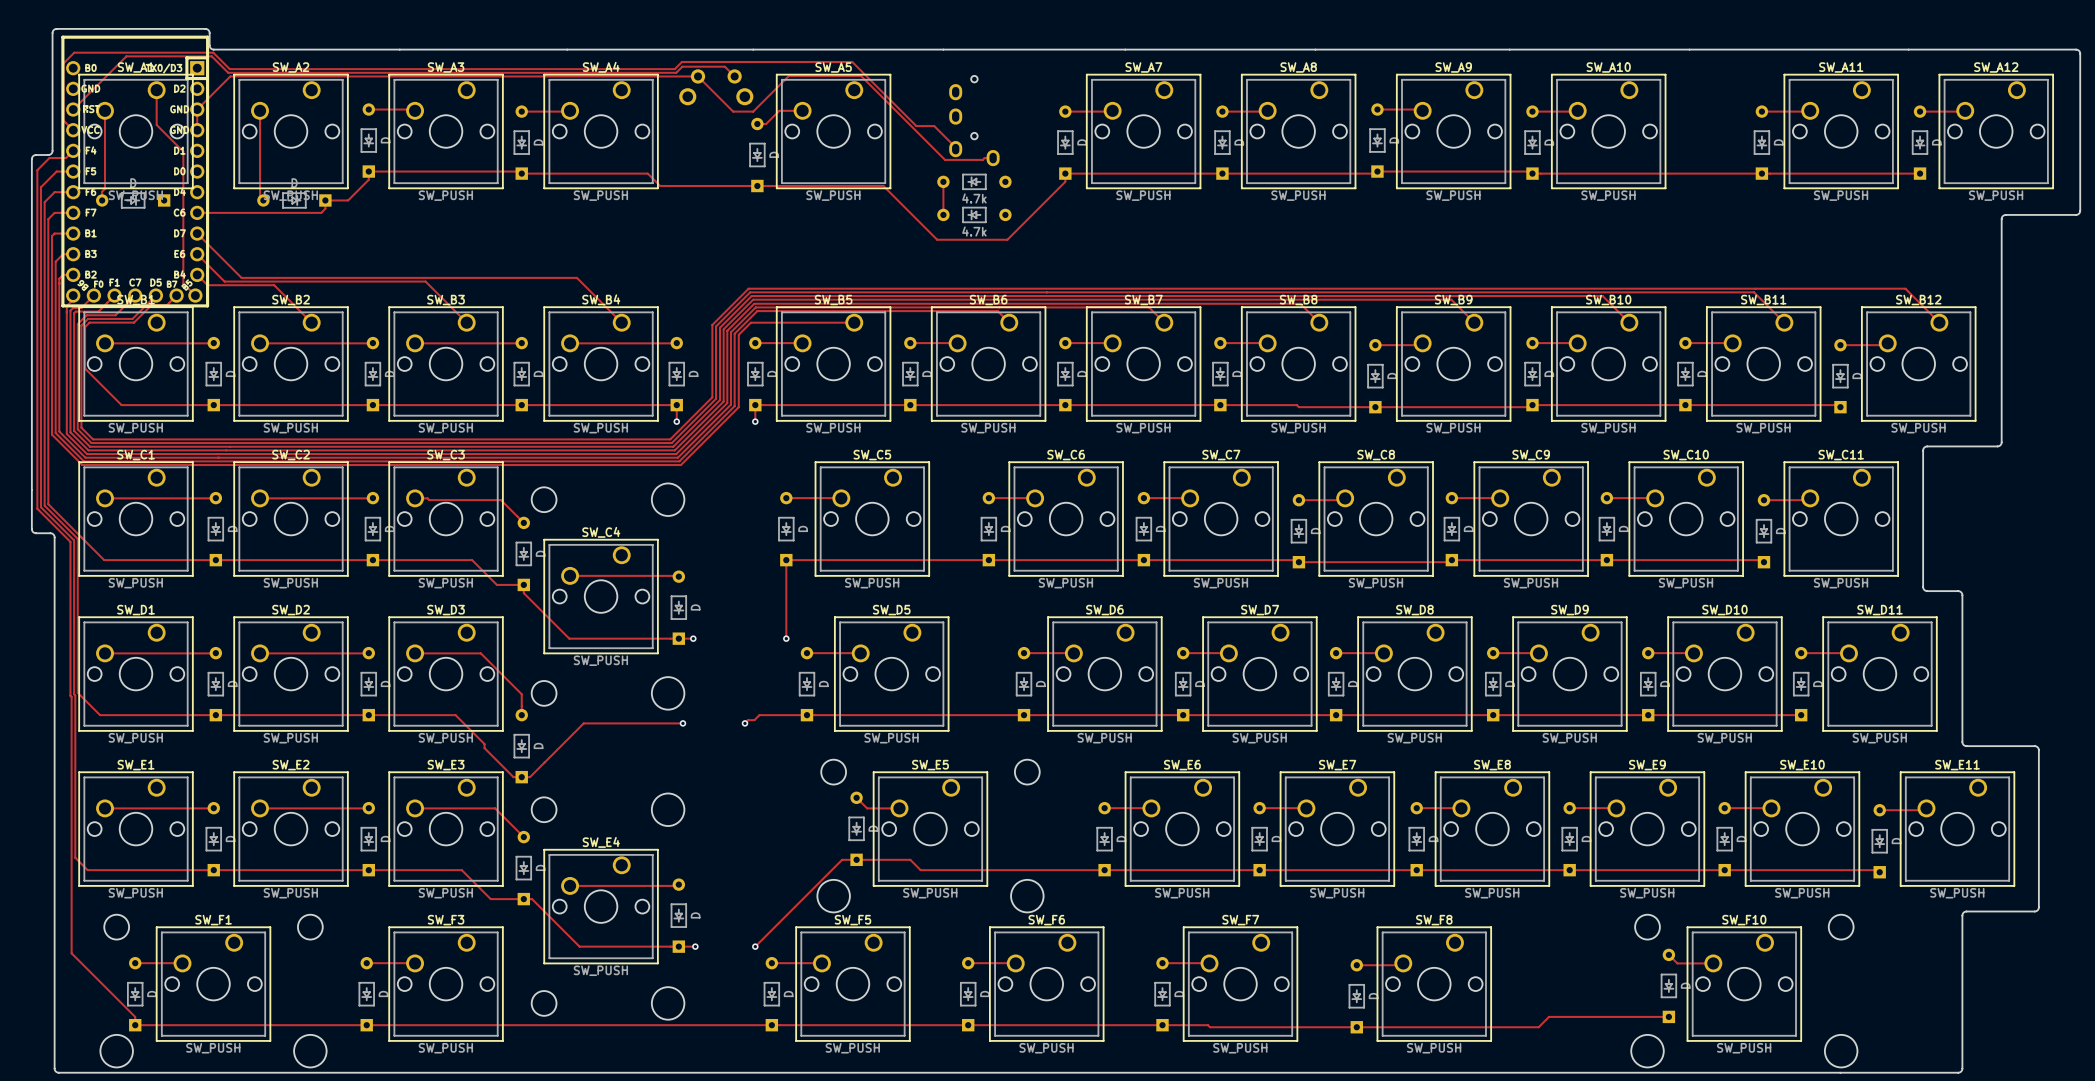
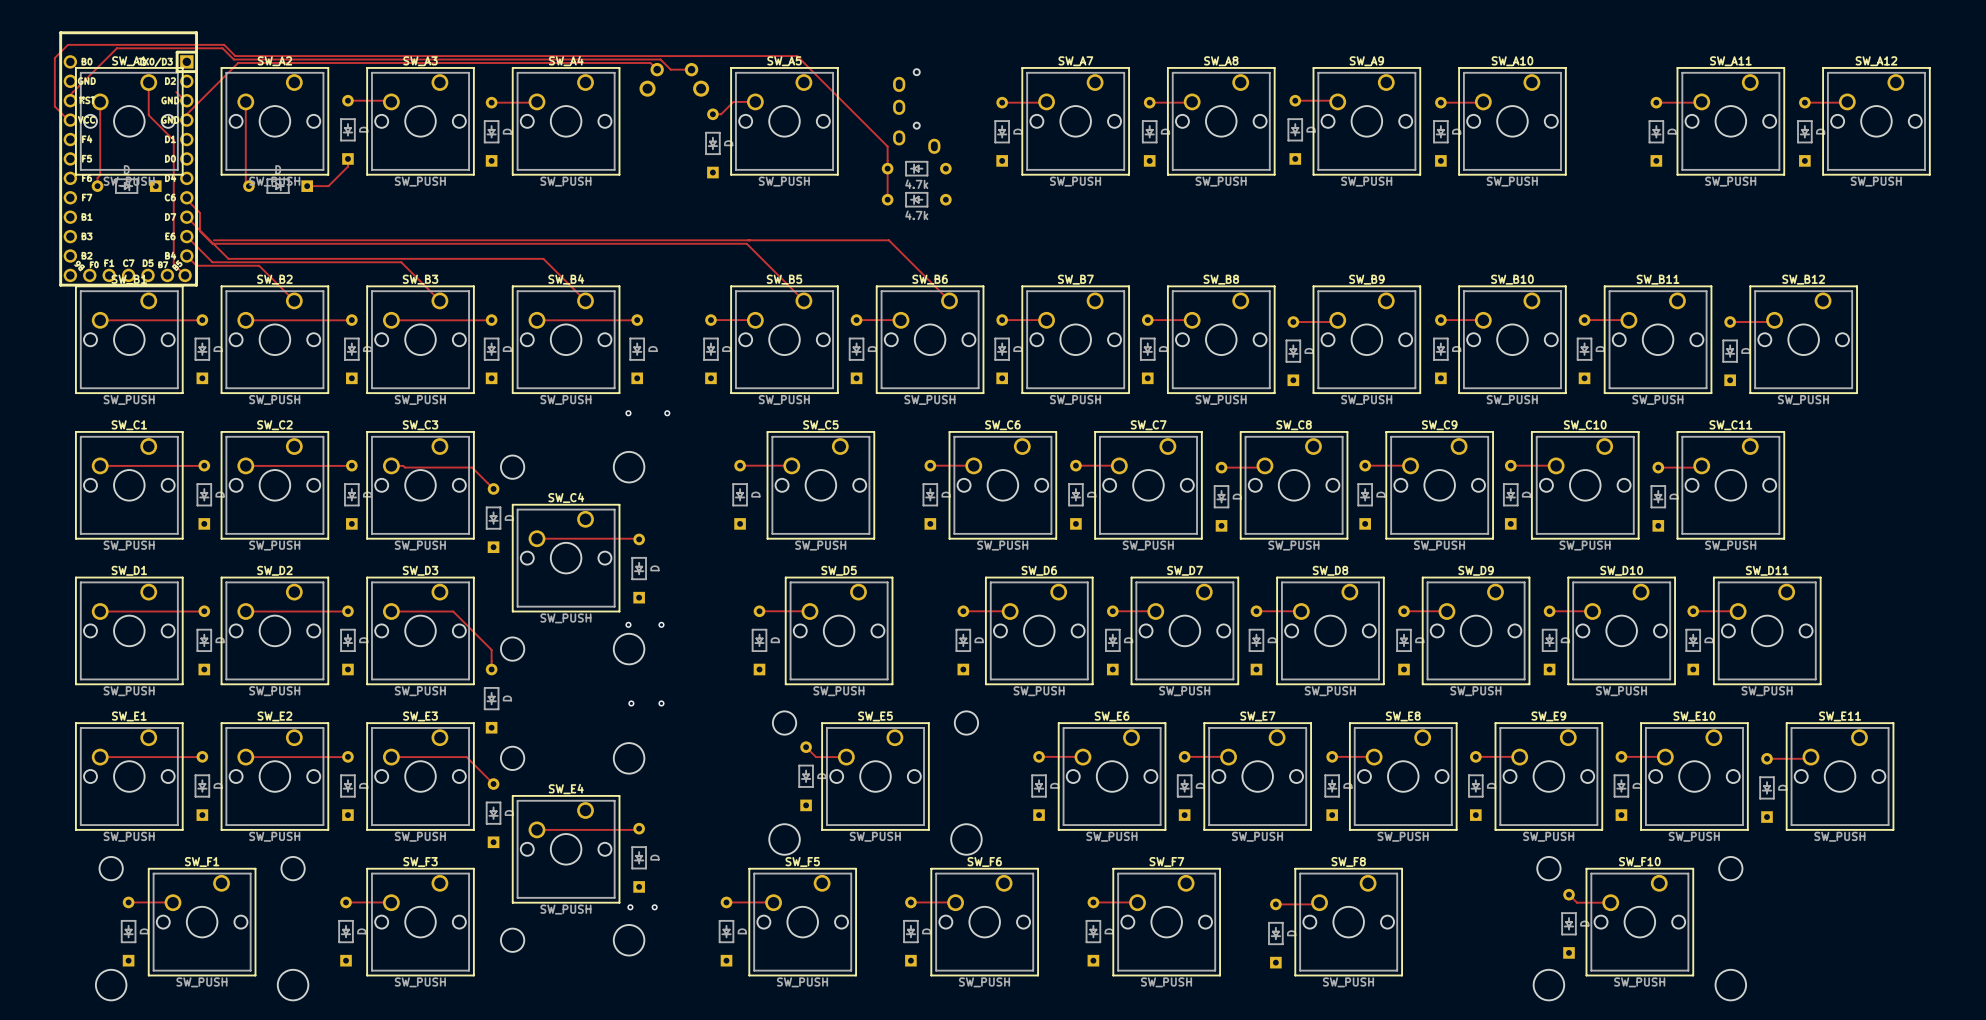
board edge: (56, 28) (206, 28) (209, 31) (209, 47) (213, 49) (2078, 50) (2080, 53) (2079, 212) (2076, 214) (2005, 214) (2001, 218) (2001, 443) (1997, 446) (1926, 446) (1923, 450) (1923, 588) (1926, 591) (1958, 591) (1962, 594) (1962, 743) (1966, 746) (2035, 746) (2038, 750) (2038, 908) (2035, 911) (1966, 911) (1962, 914) (1961, 1070) (1958, 1072) (56, 1072) (54, 1068) (54, 537) (52, 533) (34, 533) (31, 529) (31, 159) (34, 155) (49, 154) (52, 151) (52, 33) (56, 28) -> none
track: (681, 61) (674, 69) (229, 69) (213, 52) (74, 52) (63, 63) (63, 120) (73, 130) -> (642, 56) (235, 56) (224, 44) (67, 44) (54, 58) (54, 106) (66, 118)
track: (847, 61) (852, 61) (916, 126) (934, 126) (955, 149) -> (797, 56) (810, 69)
track: (861, 75) (788, 75) (753, 111) (733, 111) (698, 76) (230, 76) (197, 109) (197, 130) -> none
track: none -> (657, 69) (650, 62) (238, 62) (182, 118) (182, 98) (176, 92)
track: (734, 76) (724, 66) (682, 66) (676, 72) (228, 72) (211, 56) (126, 56) (73, 109) -> (691, 69) (670, 69) (660, 59) (233, 59) (222, 48) (116, 48) (66, 98)
track: (73, 150) (66, 158) (49, 158) (37, 170) (37, 508) (70, 541) (71, 953) (135, 1016) (135, 1025) (1207, 1025) (1210, 1027) (1538, 1027) (1549, 1016) (1668, 1016) -> none
track: (993, 158) (982, 159) (945, 159) (943, 158) -> (887, 168) (887, 146)
track: (73, 171) (56, 171) (41, 187) (41, 507) (74, 540) (75, 857) (87, 870) (461, 870) (490, 899) (532, 899) (579, 946) (695, 946) -> none
track: (368, 171) (647, 173) (660, 186) (883, 186) (937, 239) (1007, 239) (1065, 181) (1065, 173) (1375, 173) (1377, 171) (1920, 173) -> none
track: (73, 192) (54, 192) (44, 202) (44, 505) (77, 538) (77, 692) (100, 715) (455, 715) (513, 777) (529, 777) (583, 723) (682, 723) -> none
track: (325, 200) (325, 208) (321, 212) (197, 212) -> none
track: (73, 212) (54, 212) (48, 219) (48, 504) (104, 560) (472, 560) (496, 584) (523, 584) (523, 593) (569, 638) (693, 638) -> none
track: (73, 233) (54, 233) (51, 236) (51, 434) (82, 465) (680, 465) (738, 407) (738, 334) (750, 322) (854, 322) -> (182, 195) (199, 212) (199, 231) (212, 243) (746, 243) (803, 300)
track: (73, 254) (63, 254) (55, 261) (55, 433) (83, 461) (679, 461) (734, 406) (734, 333) (757, 311) (997, 311) -> (213, 240) (888, 240) (938, 290)
track: (73, 274) (63, 274) (59, 278) (59, 431) (85, 457) (677, 457) (730, 404) (730, 332) (755, 307) (1149, 307) (1164, 322) -> none
track: (73, 295) (73, 299) (66, 306) (66, 433) (86, 454) (676, 454) (727, 403) (727, 330) (754, 303) (1300, 303) (1319, 322) -> none
track: (93, 295) (81, 307) (73, 307) (70, 310) (70, 432) (88, 450) (674, 450) (723, 401) (723, 329) (753, 299) (1451, 299) (1474, 322) -> none
track: (114, 295) (98, 311) (75, 311) (74, 313) (74, 430) (90, 446) (673, 446) (719, 400) (719, 327) (751, 296) (1602, 296) (1629, 322) -> none
track: (135, 295) (115, 315) (86, 315) (77, 324) (77, 429) (91, 443) (671, 443) (716, 398) (716, 326) (750, 292) (1754, 292) (1784, 322) -> none
track: (155, 295) (132, 318) (88, 318) (81, 325) (81, 427) (93, 439) (670, 439) (712, 397) (712, 324) (748, 288) (1905, 288) (1939, 322) -> none
track: (176, 295) (166, 305) (151, 305) (134, 322) (89, 322) (85, 327) (85, 368) (121, 405) (676, 405) (676, 421) -> none
track: (1840, 407) (1838, 405) (1532, 405) (1530, 407) (755, 405) (755, 421) -> none
via: (676, 421) -> none
via: (755, 421) -> none
via: none -> (628, 413)
via: none -> (667, 413)
track: (1763, 562) (1761, 560) (1451, 560) (1449, 562) (1298, 562) (1296, 560) (786, 560) (786, 638) -> none
via: (693, 638) -> none
via: (786, 638) -> none
via: none -> (628, 624)
via: none -> (661, 624)
track: (1801, 715) (759, 715) (754, 720) (748, 720) (744, 723) -> none
via: (682, 723) -> none
via: (744, 723) -> none
via: none -> (631, 703)
via: none -> (661, 703)
track: (1879, 872) (1877, 870) (920, 870) (910, 859) (842, 859) (755, 946) -> none
via: (695, 946) -> none
via: (755, 946) -> none
via: none -> (630, 907)
via: none -> (654, 907)

